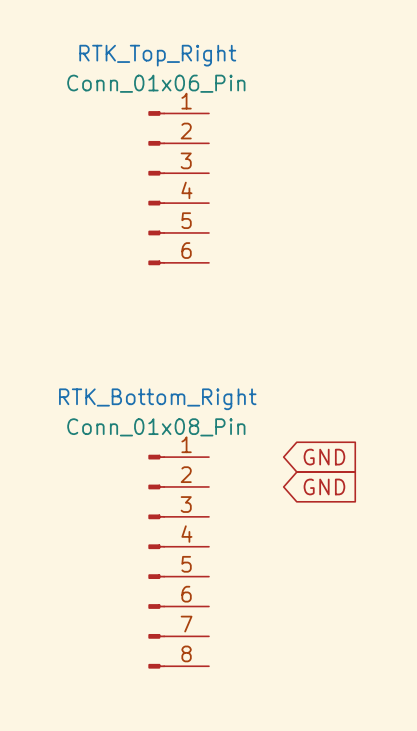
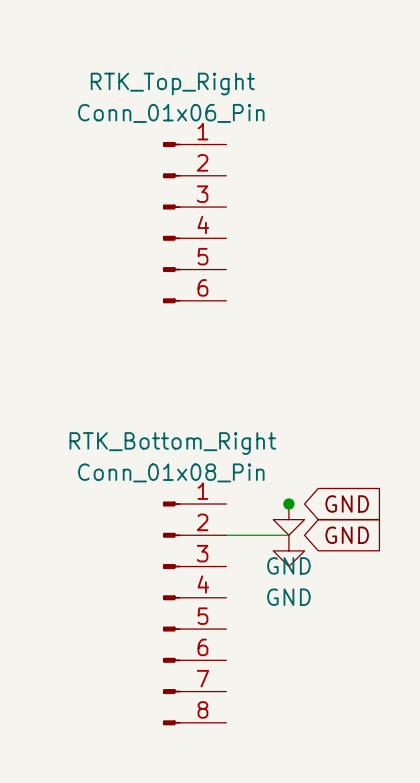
junction: none -> (288, 504)
power symbol: none -> GND (288, 519)
wire: none -> (226, 535) (288, 535)
power symbol: none -> GND (288, 550)

